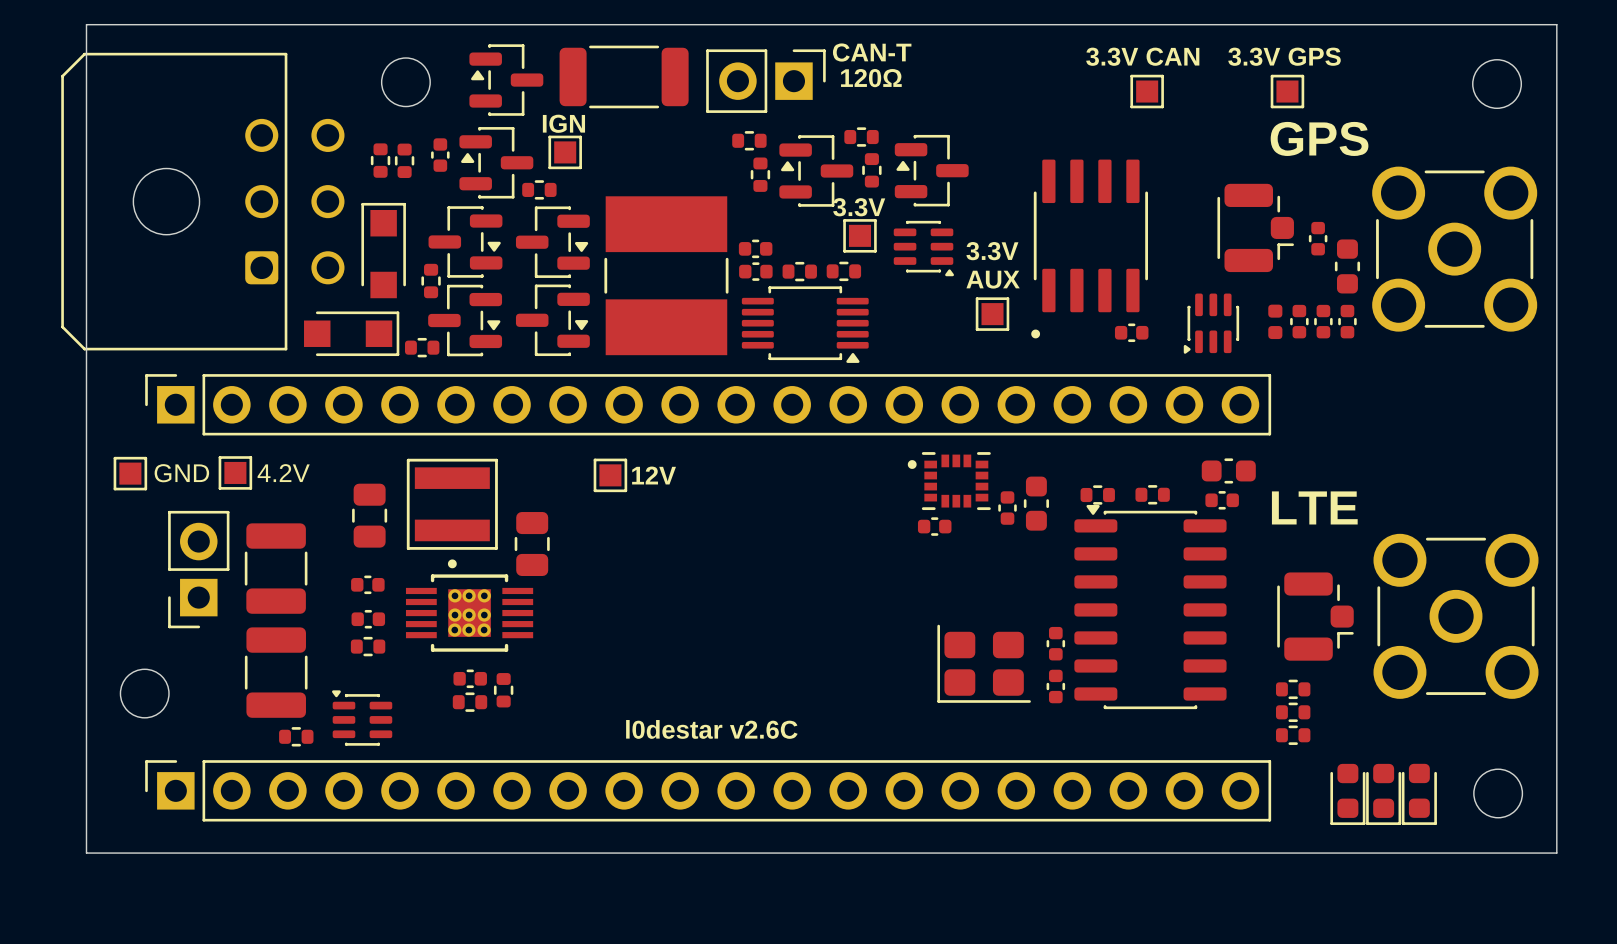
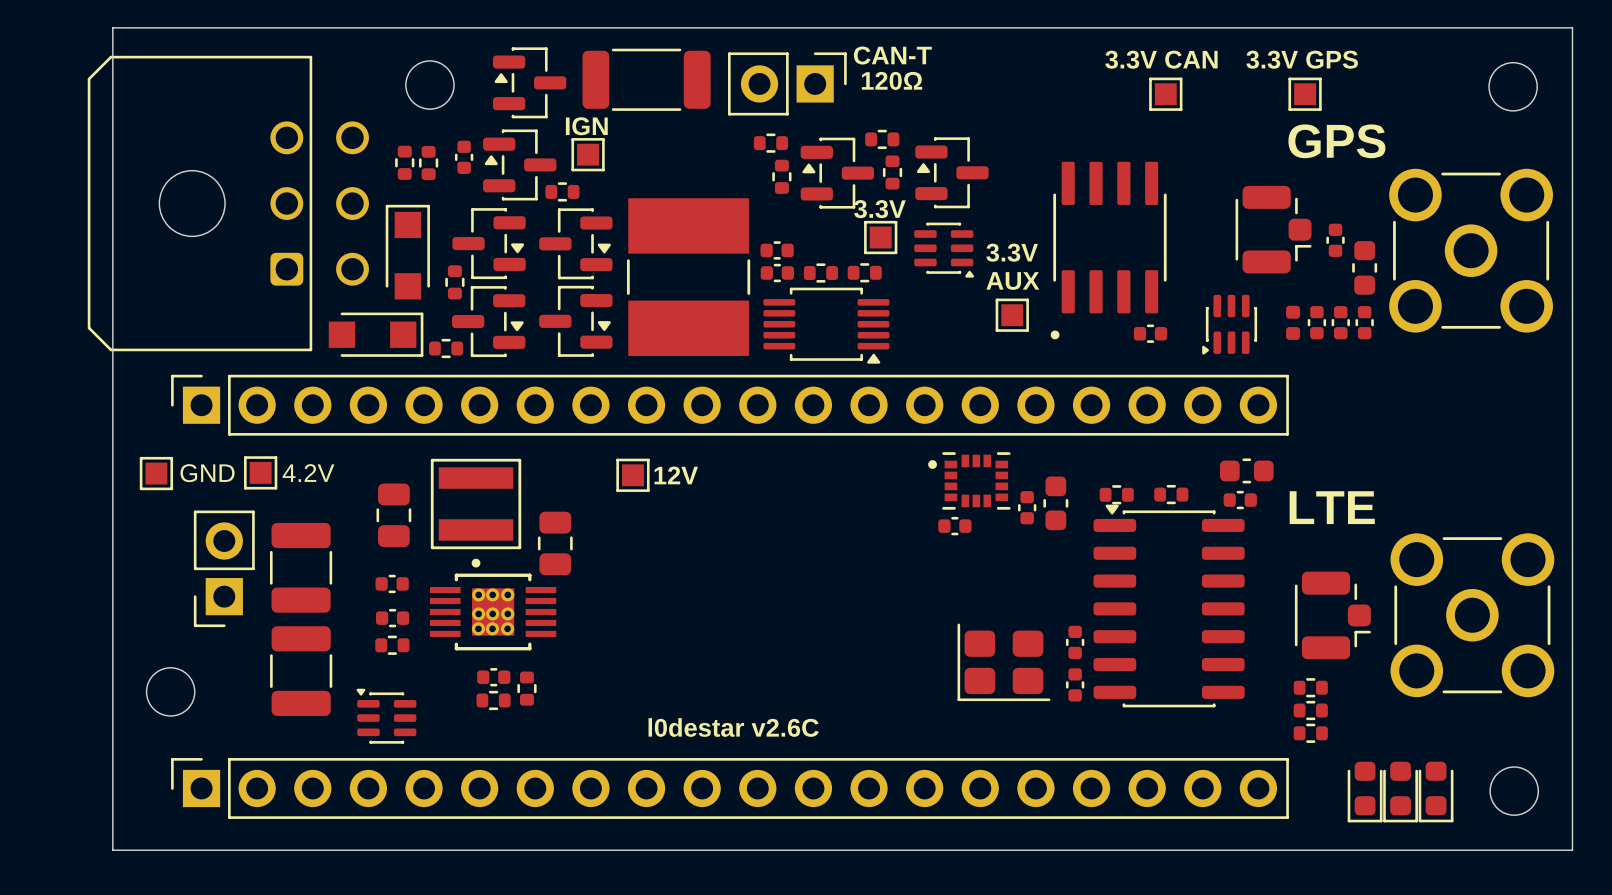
part: (296, 736) -> none

